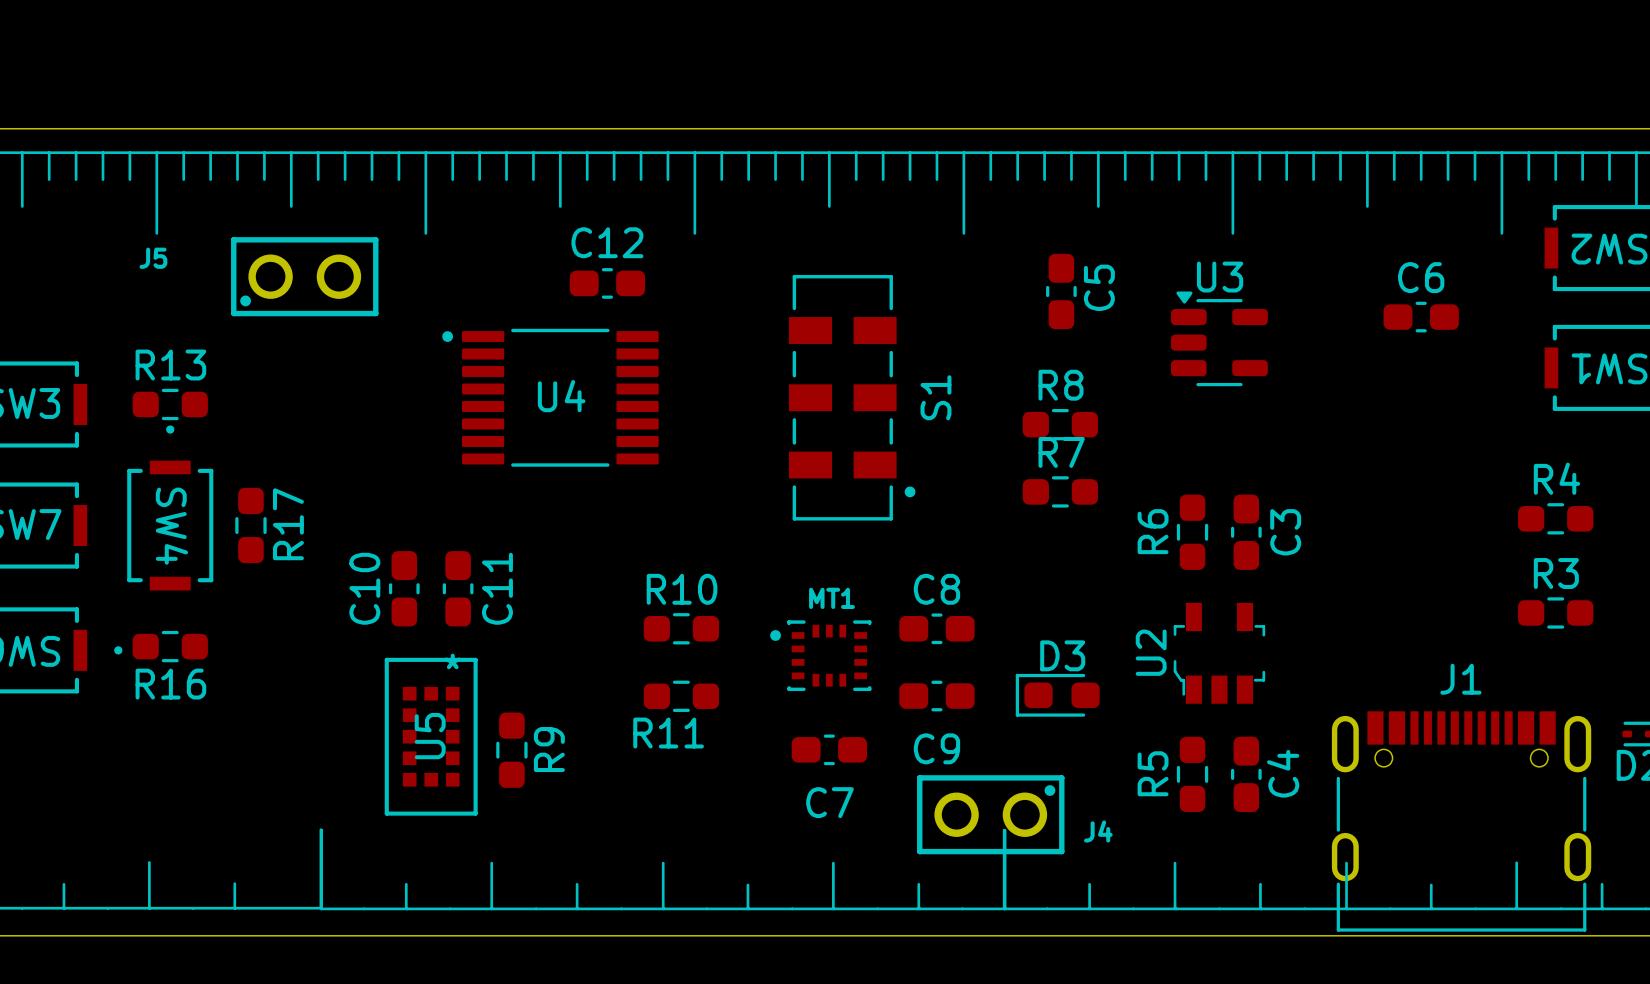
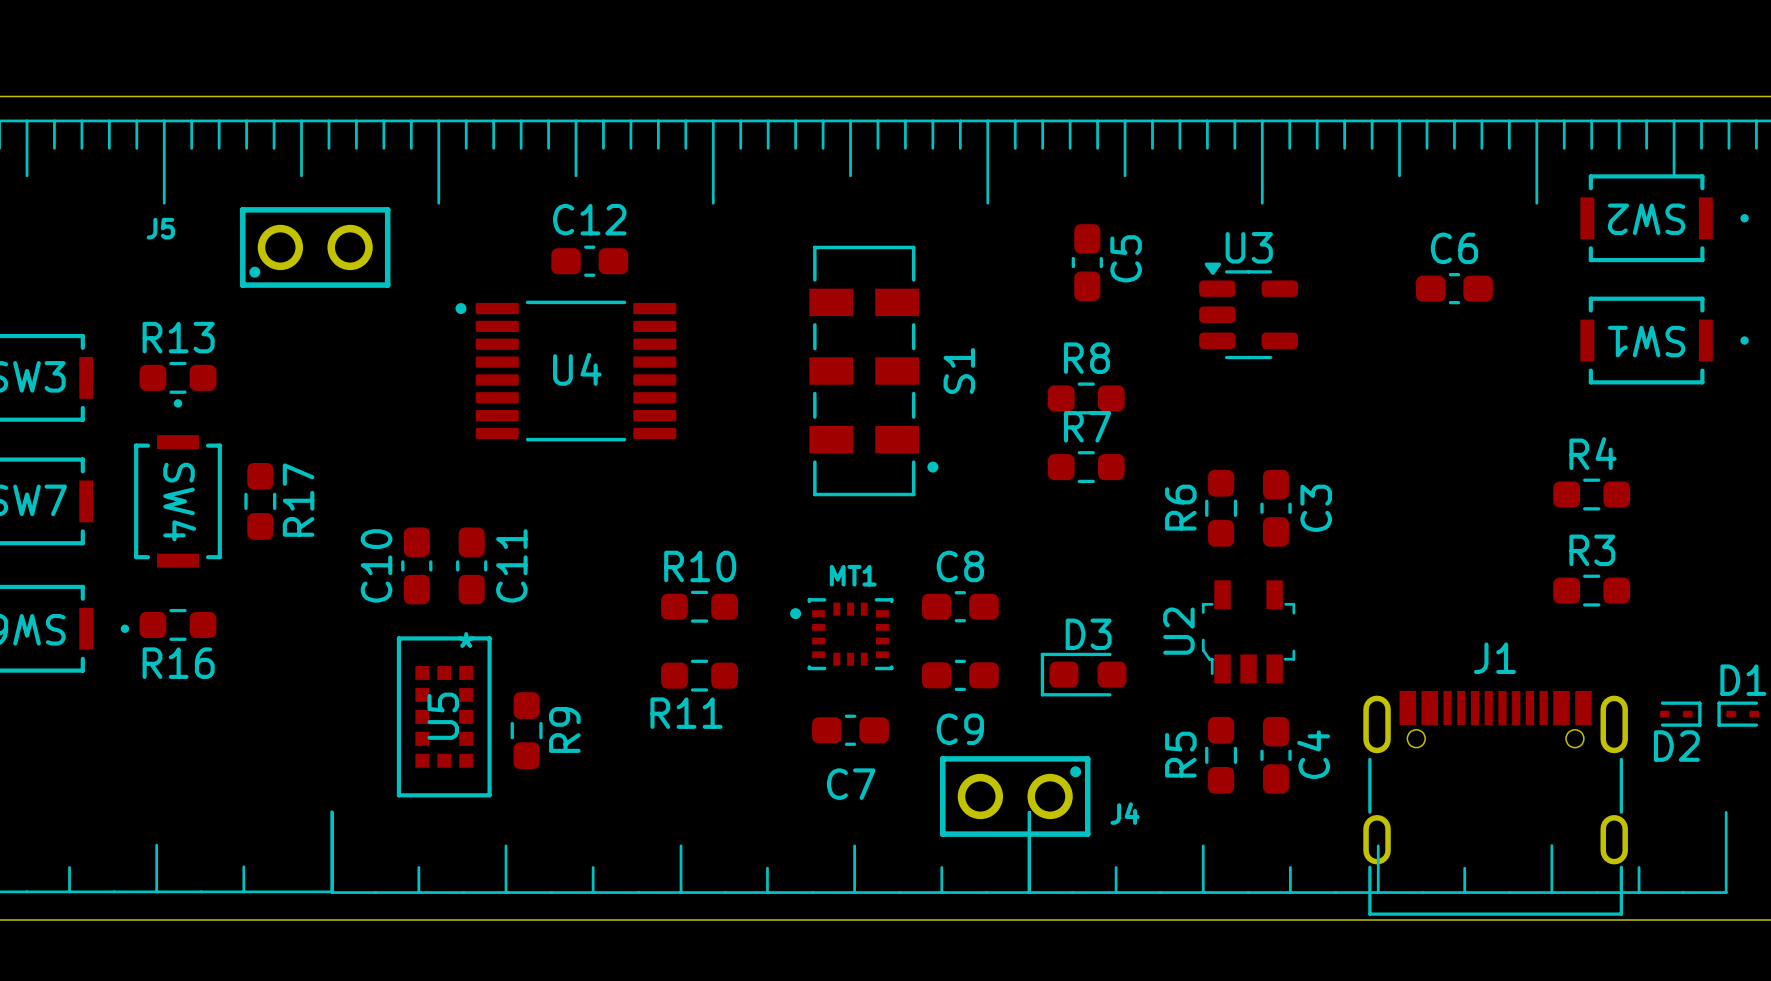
C12 position: (607, 283) -> (589, 261)

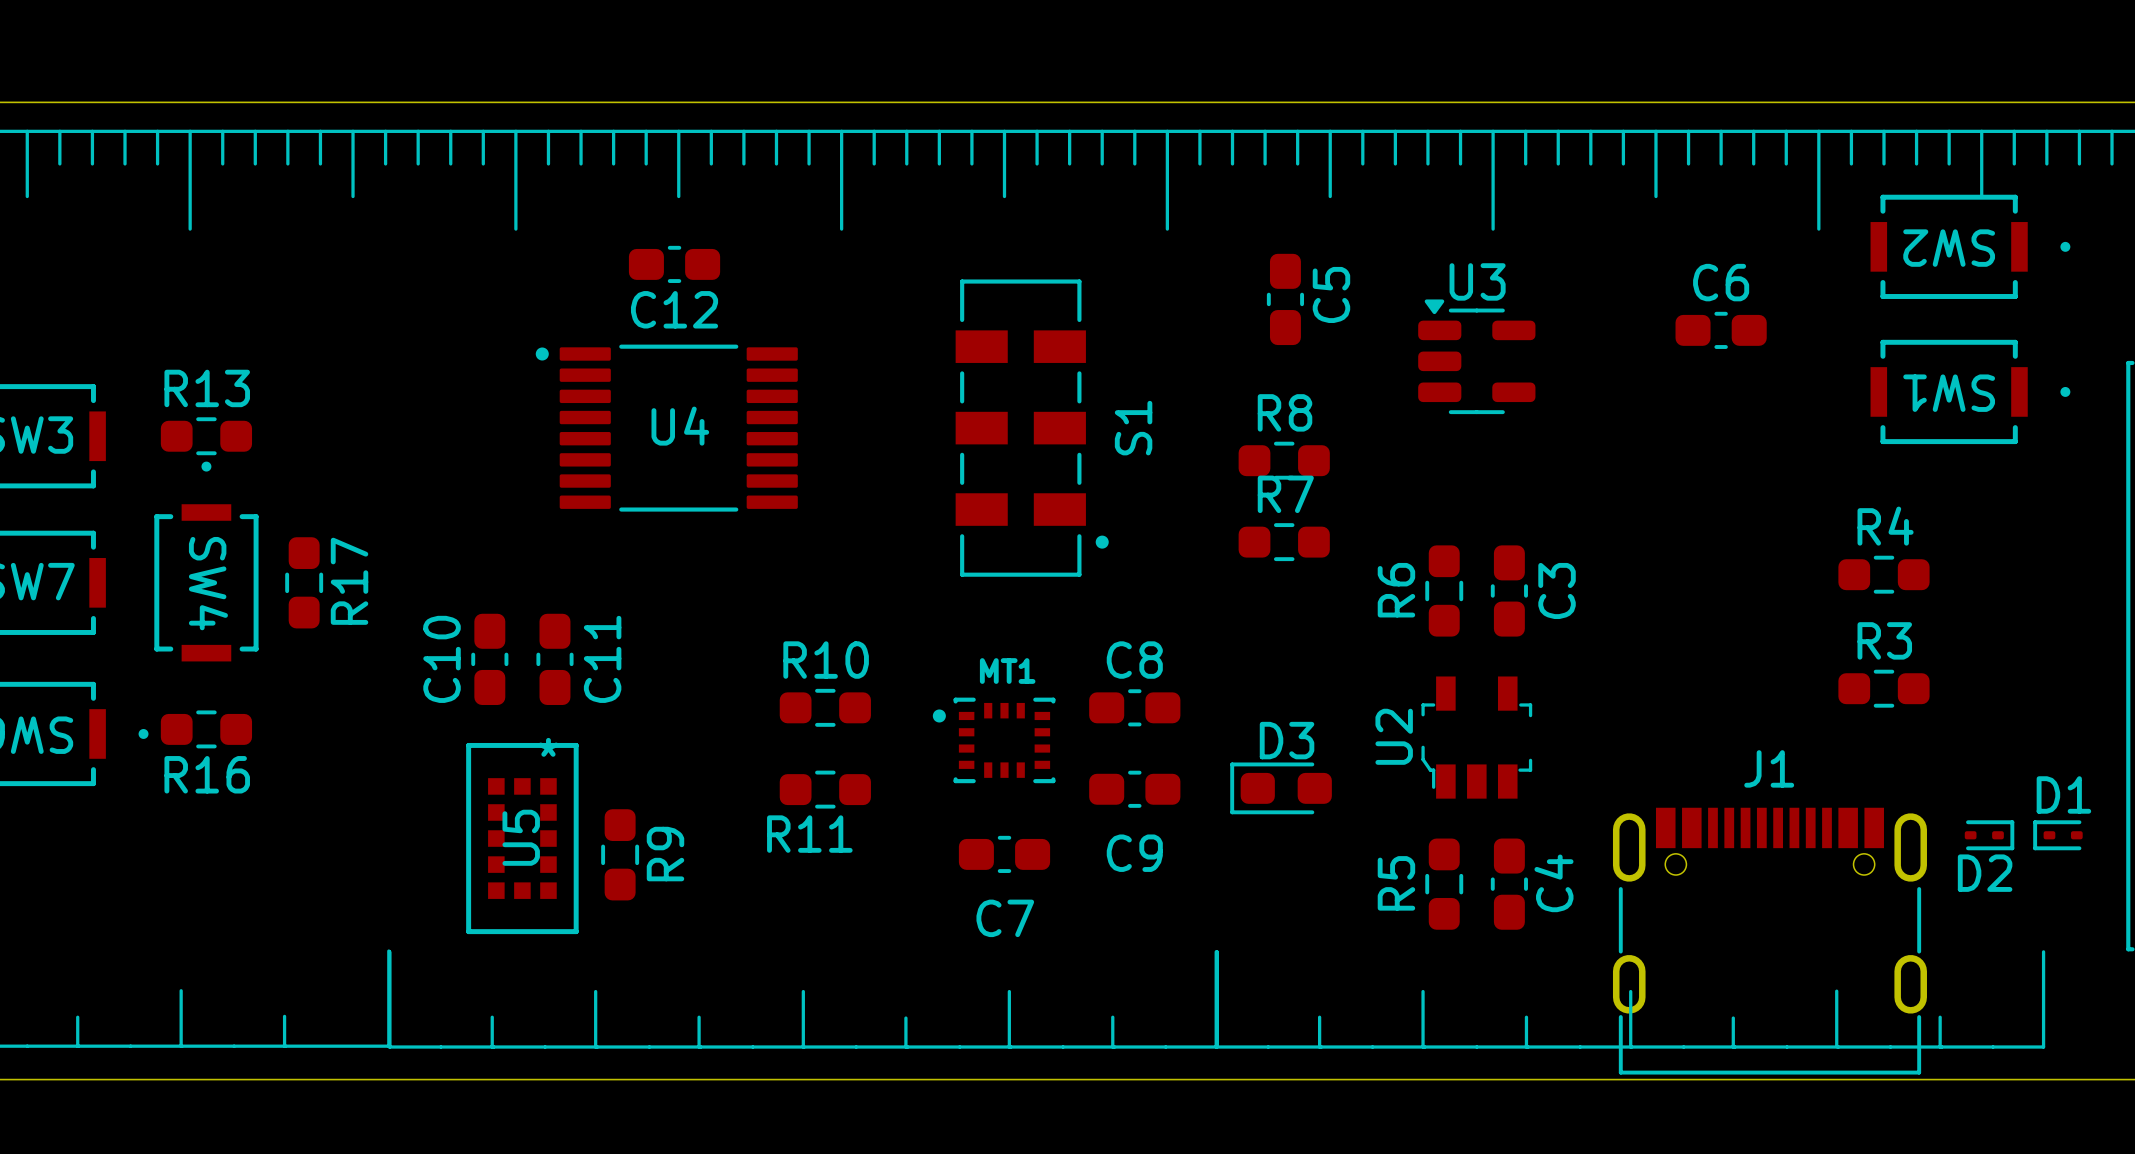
C12 name position: C12 (589, 219) -> C12 (674, 309)
J5: (315, 247) -> none
C12 position: (589, 261) -> (674, 264)
J4: (1015, 796) -> none

